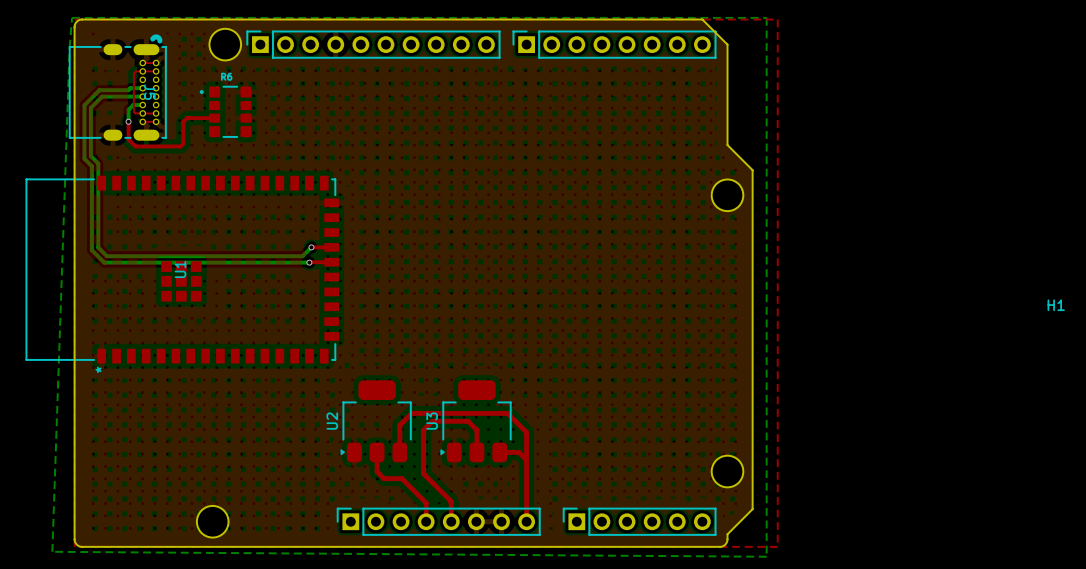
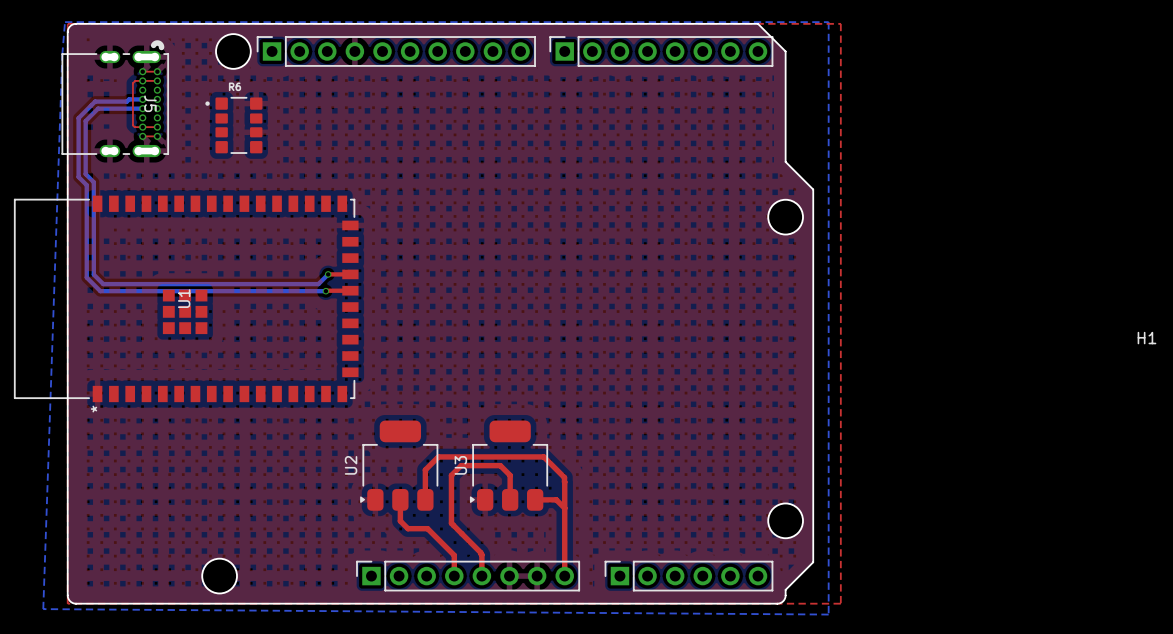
bottom track: (142, 105) (133, 105) (128, 109) (128, 121) -> none
top track: (214, 118) (186, 118) (183, 121) (183, 143) (180, 146) (135, 146) (128, 139) (128, 121) -> none
via: (128, 121) -> none

